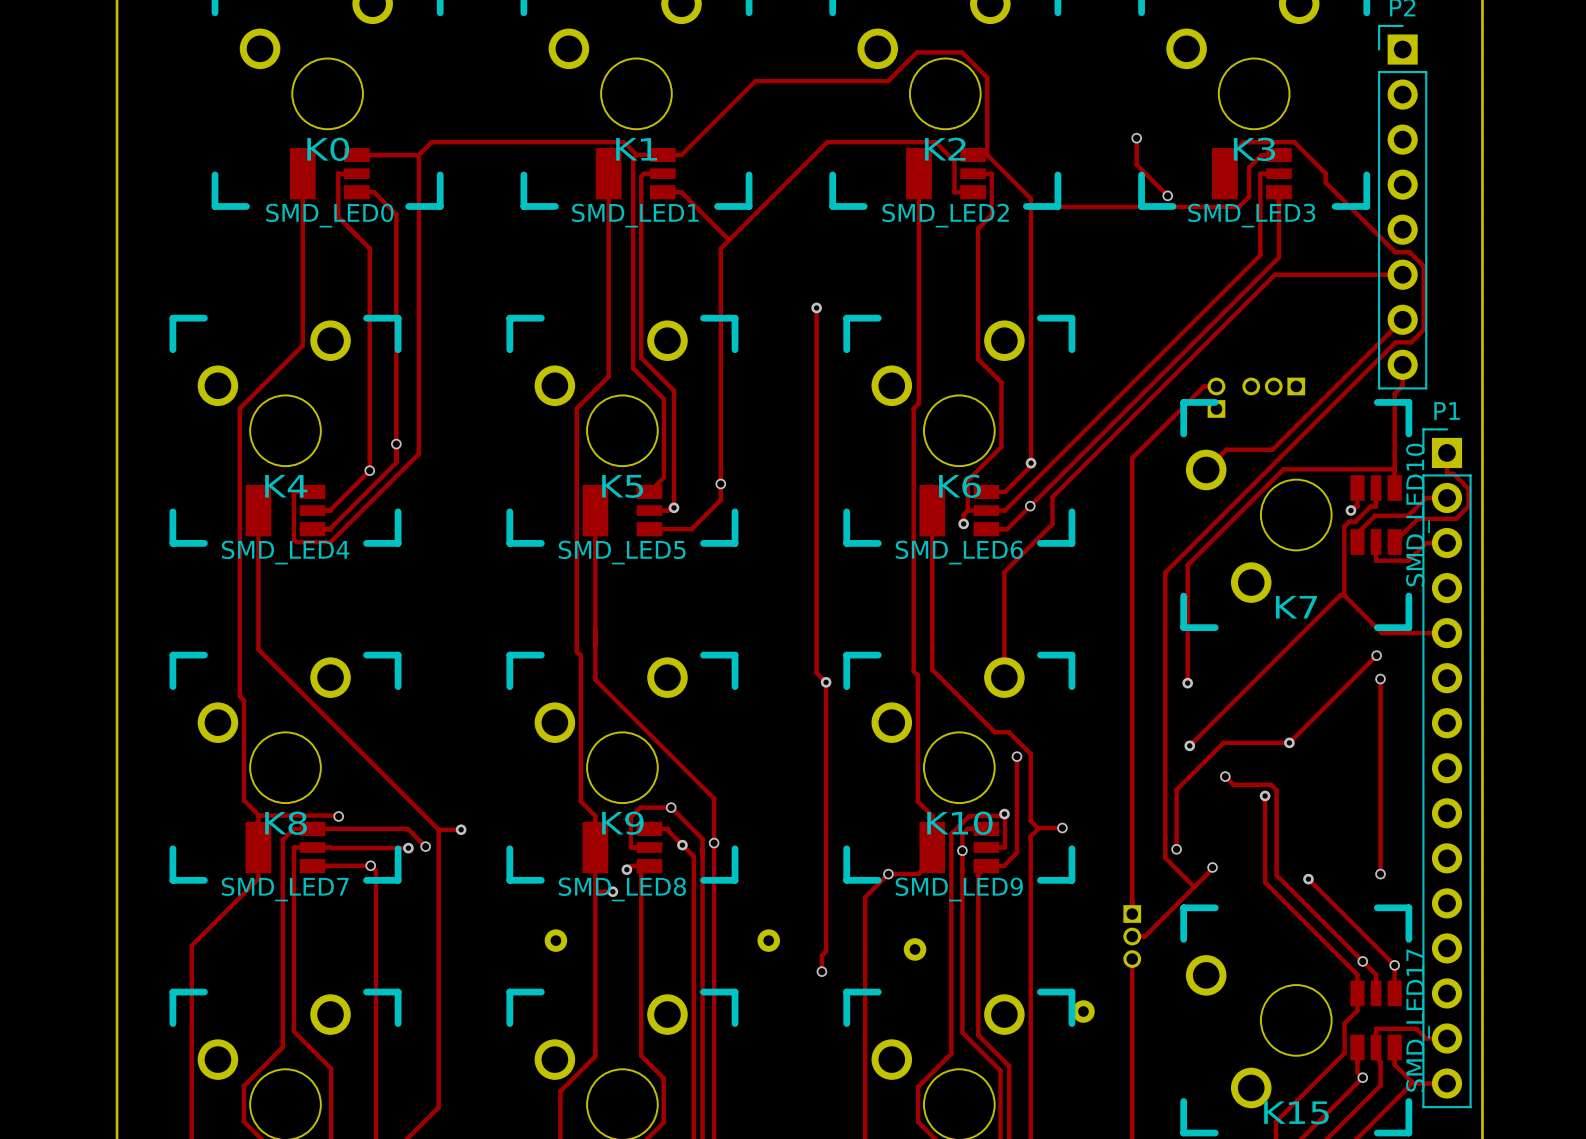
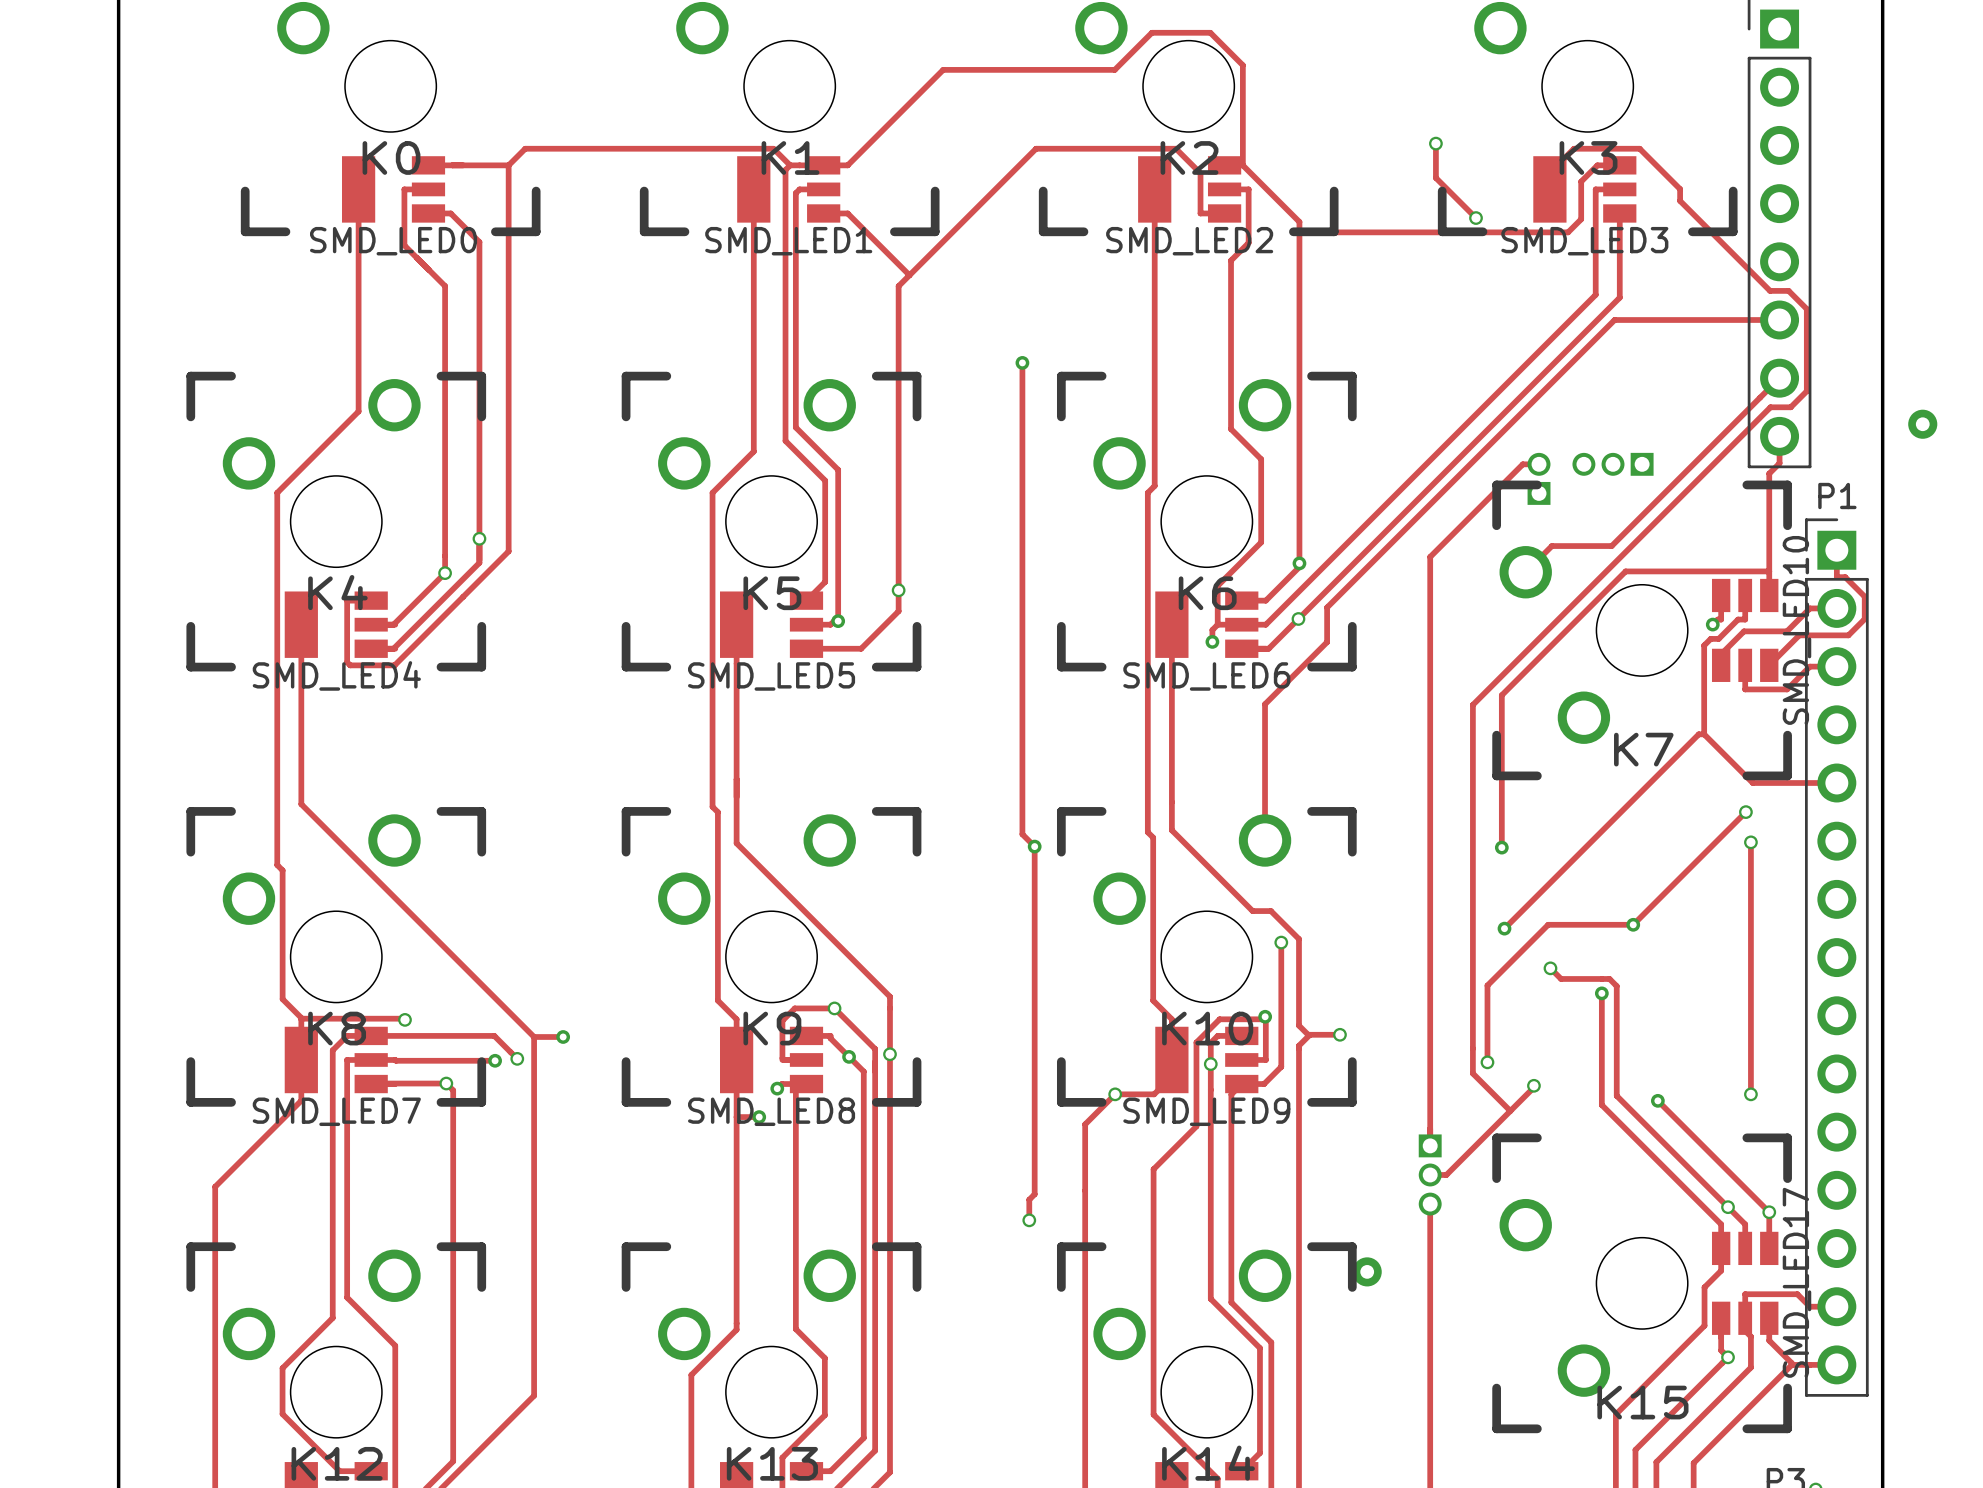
part: none -> (1922, 424)
track: (951, 898) (951, 1053) (918, 1086) -> (1196, 1126) (1153, 1169) (1153, 1369)
part: (555, 940) -> none
part: (768, 940) -> none
part: (915, 949) -> none

